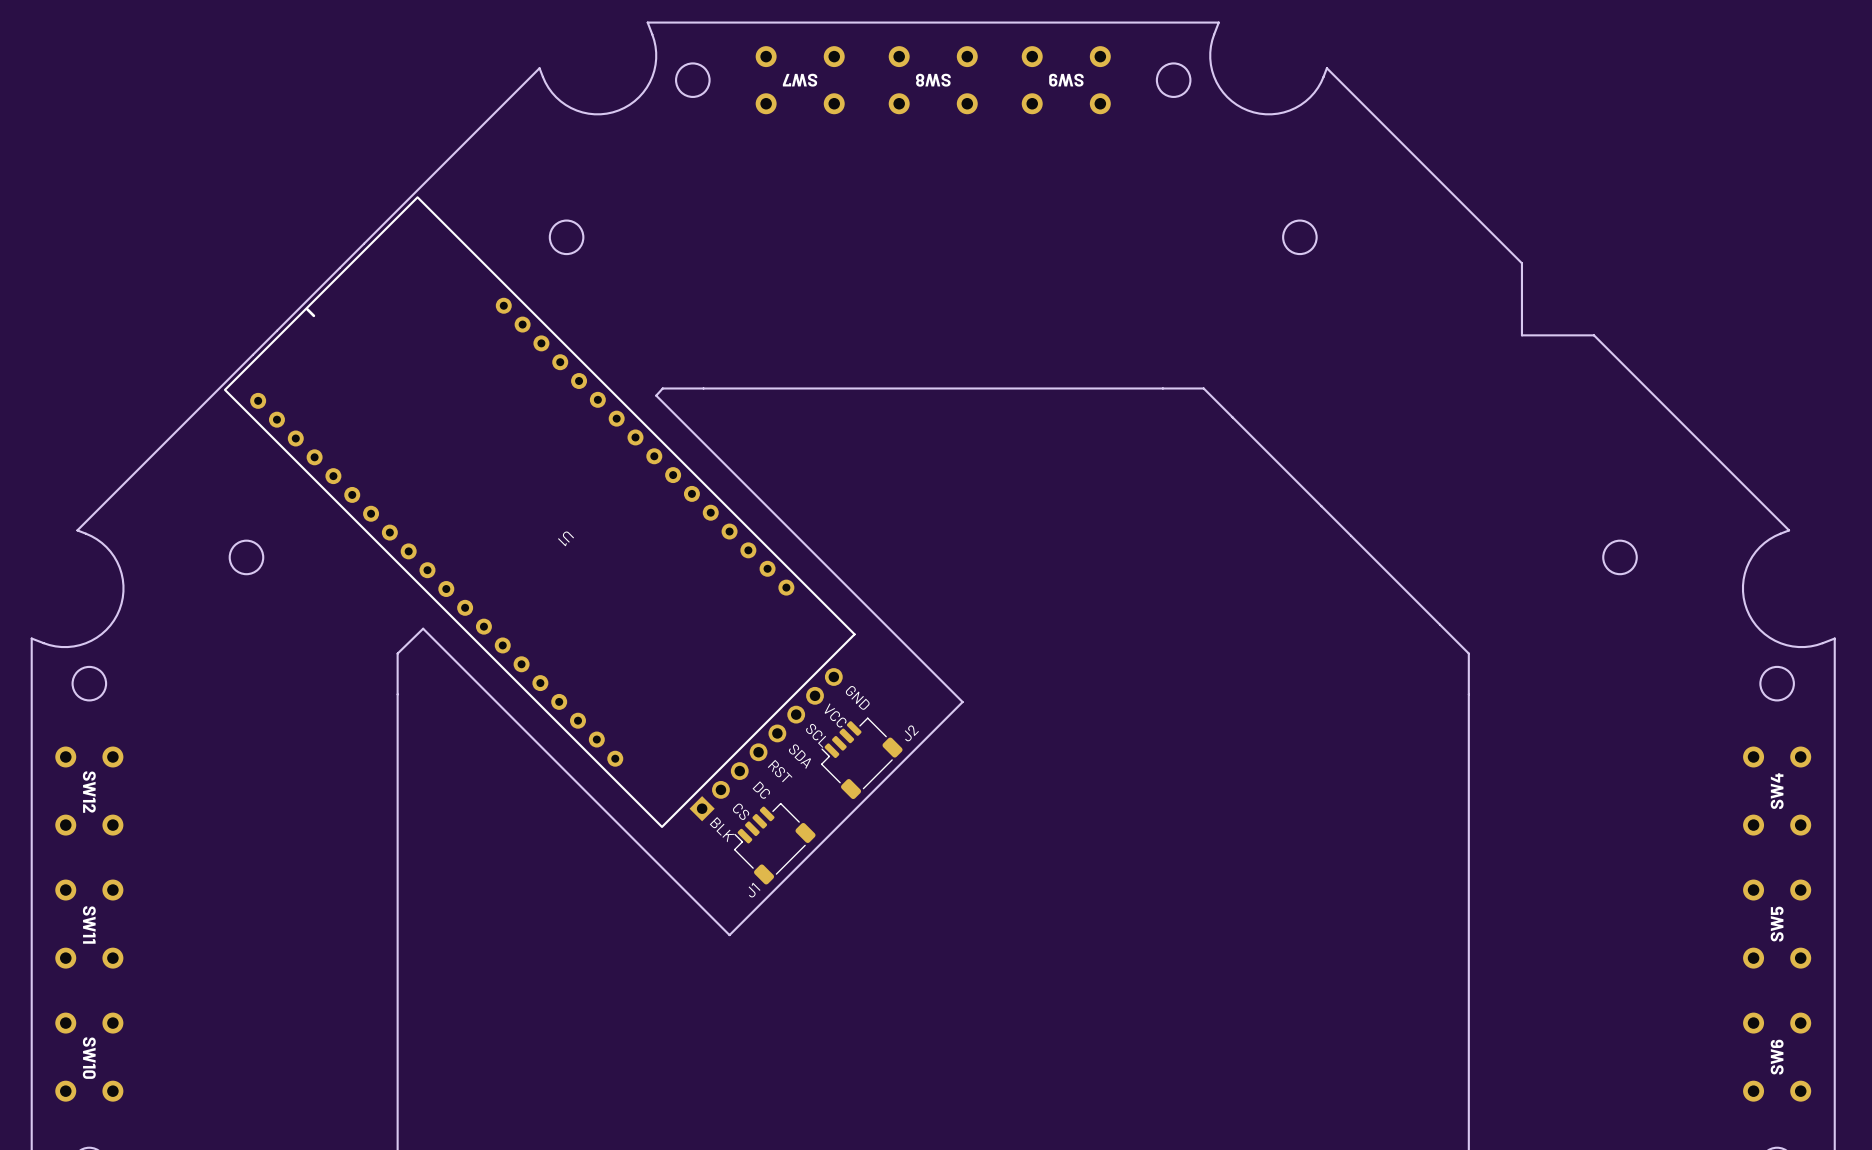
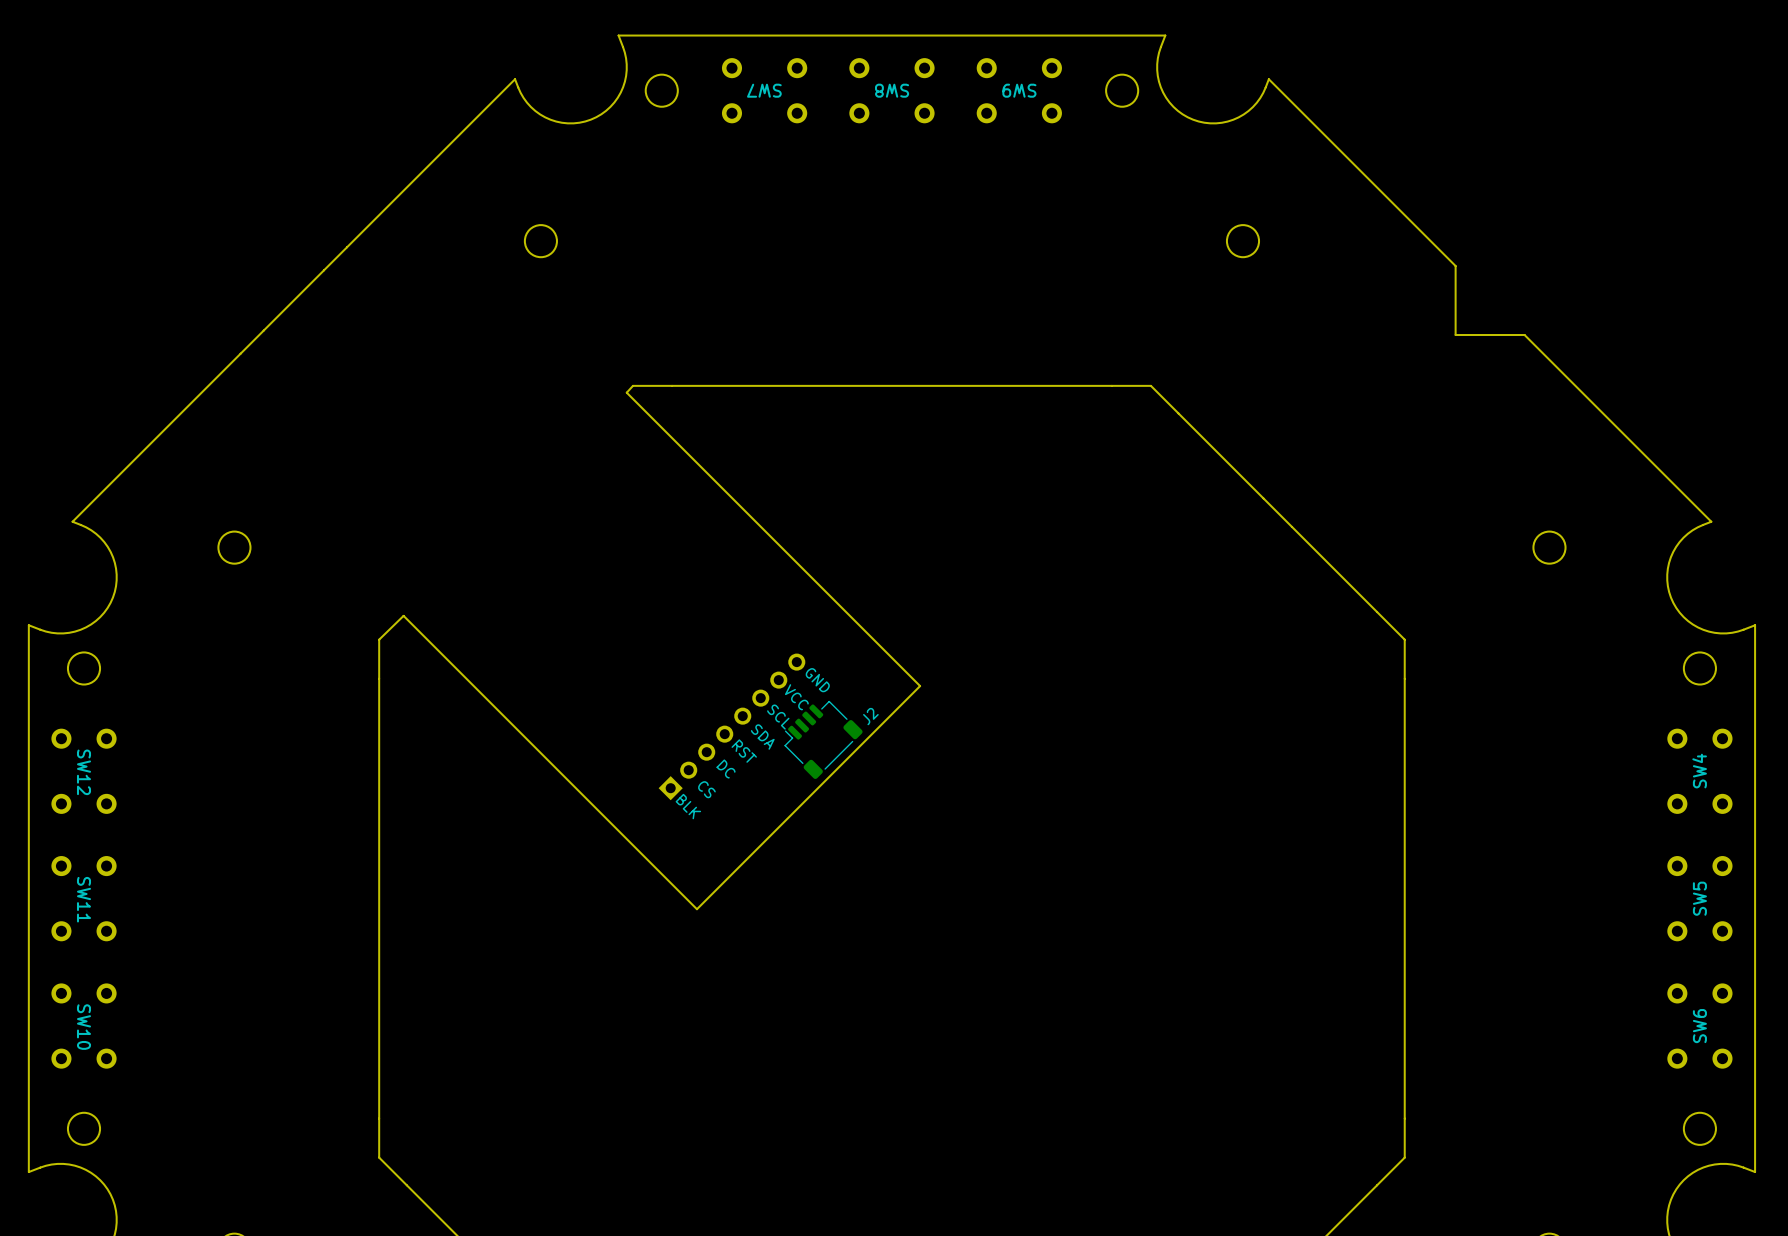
U1: (539, 512) -> none
J1: (774, 843) -> none

